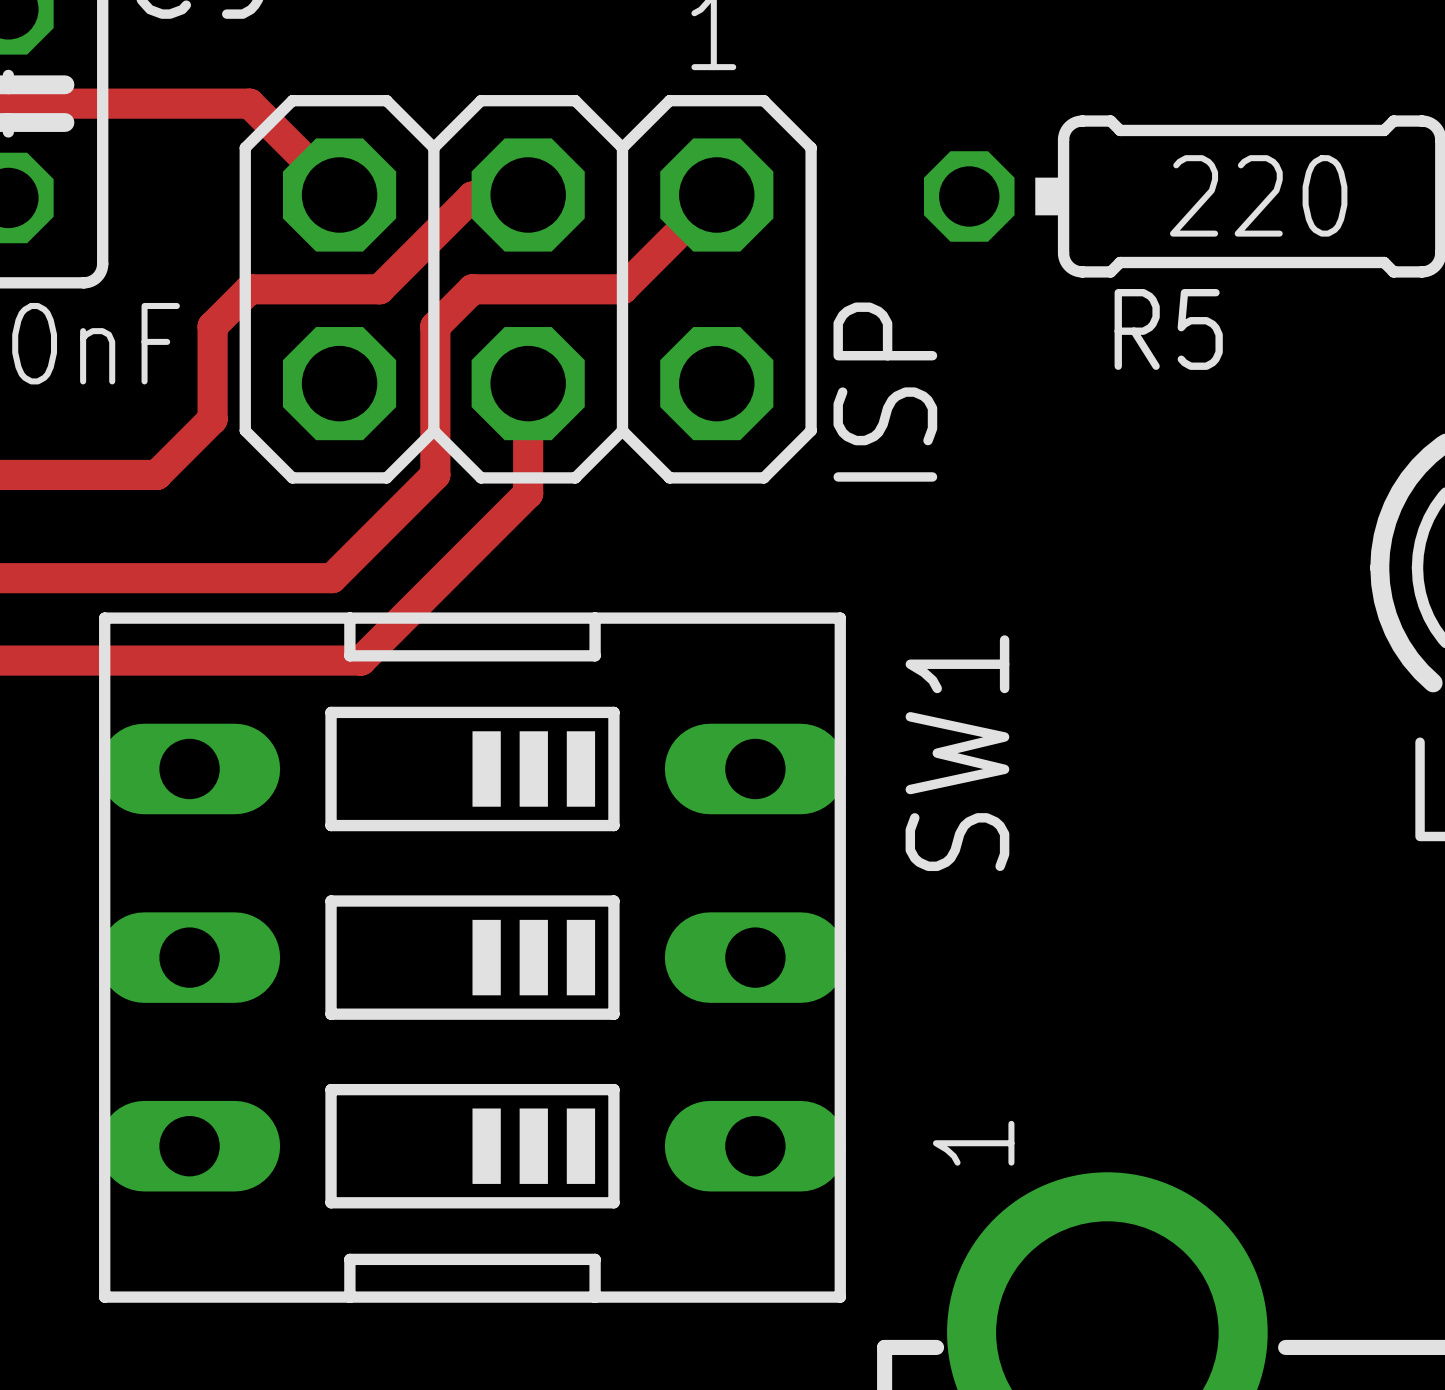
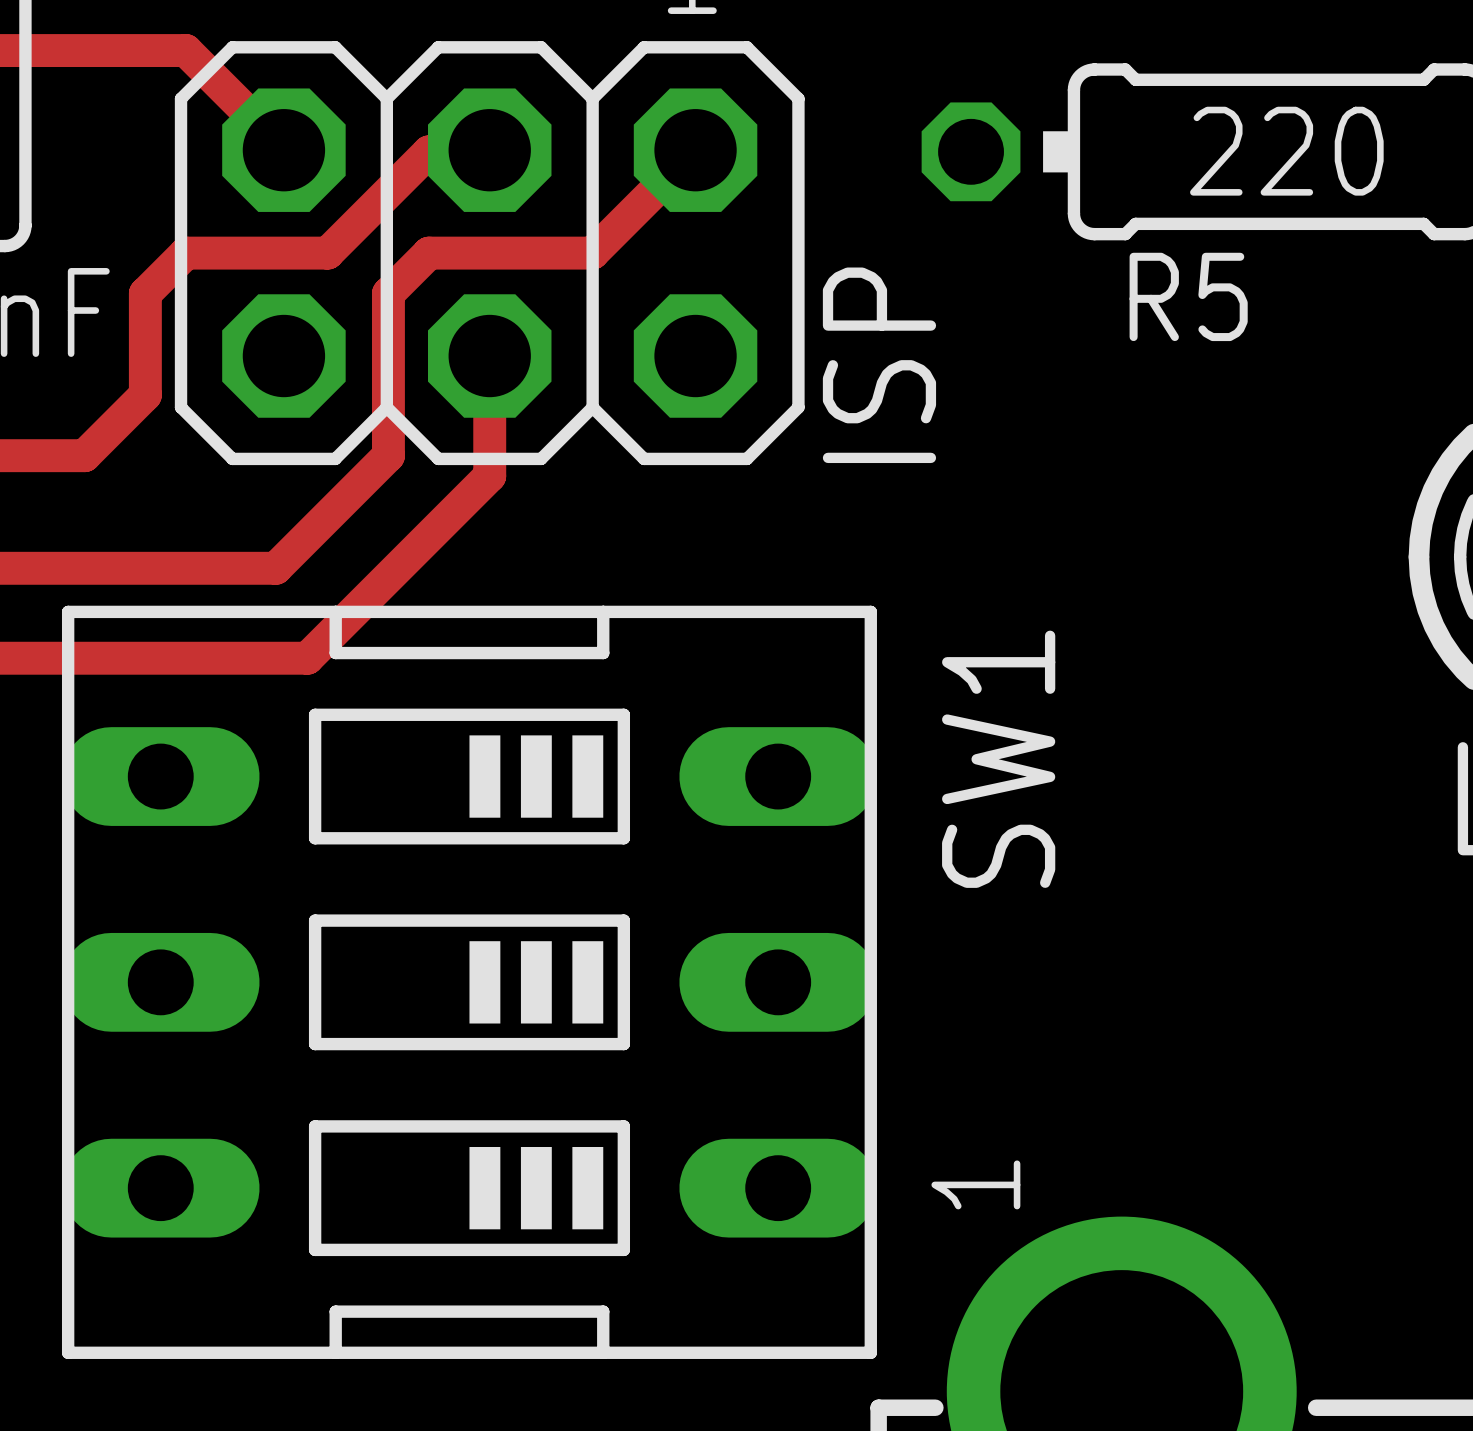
SW1 position: (472, 957) -> (469, 982)

